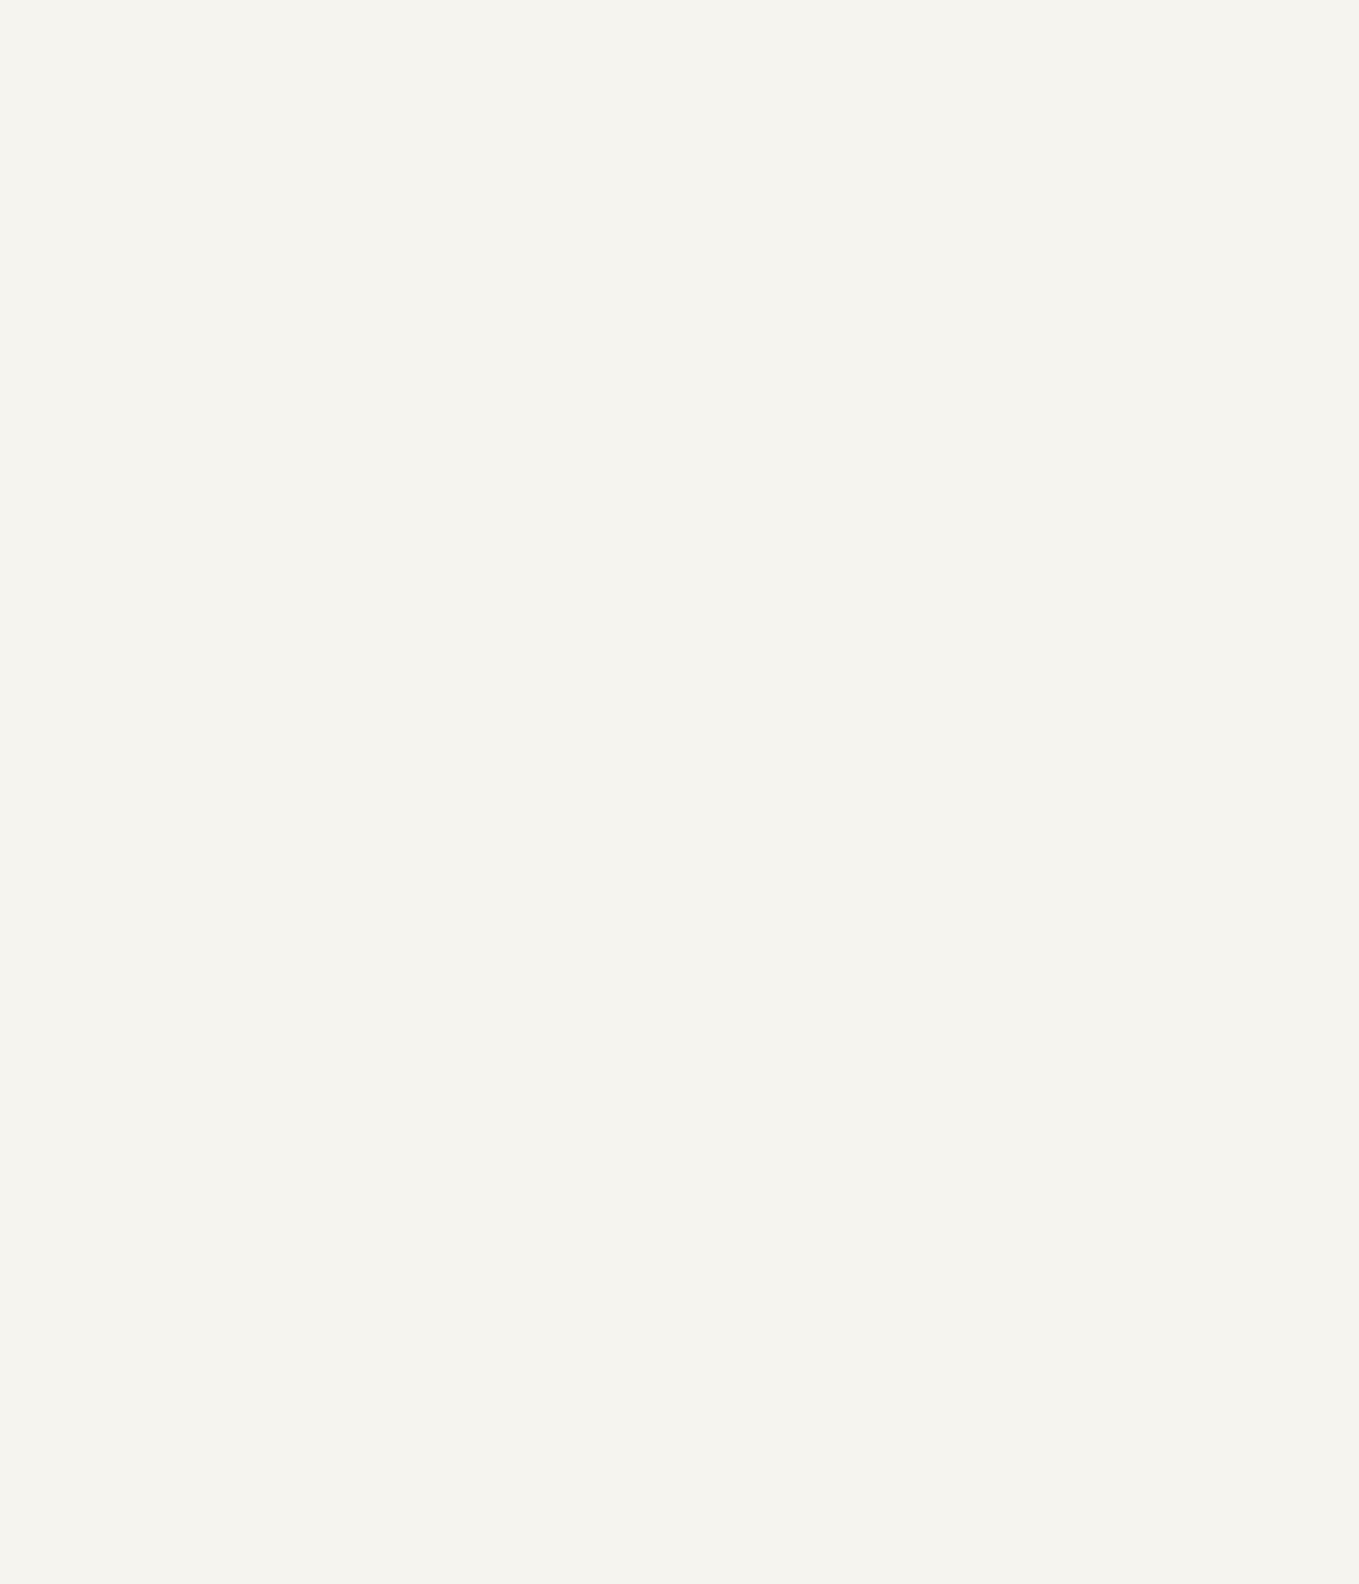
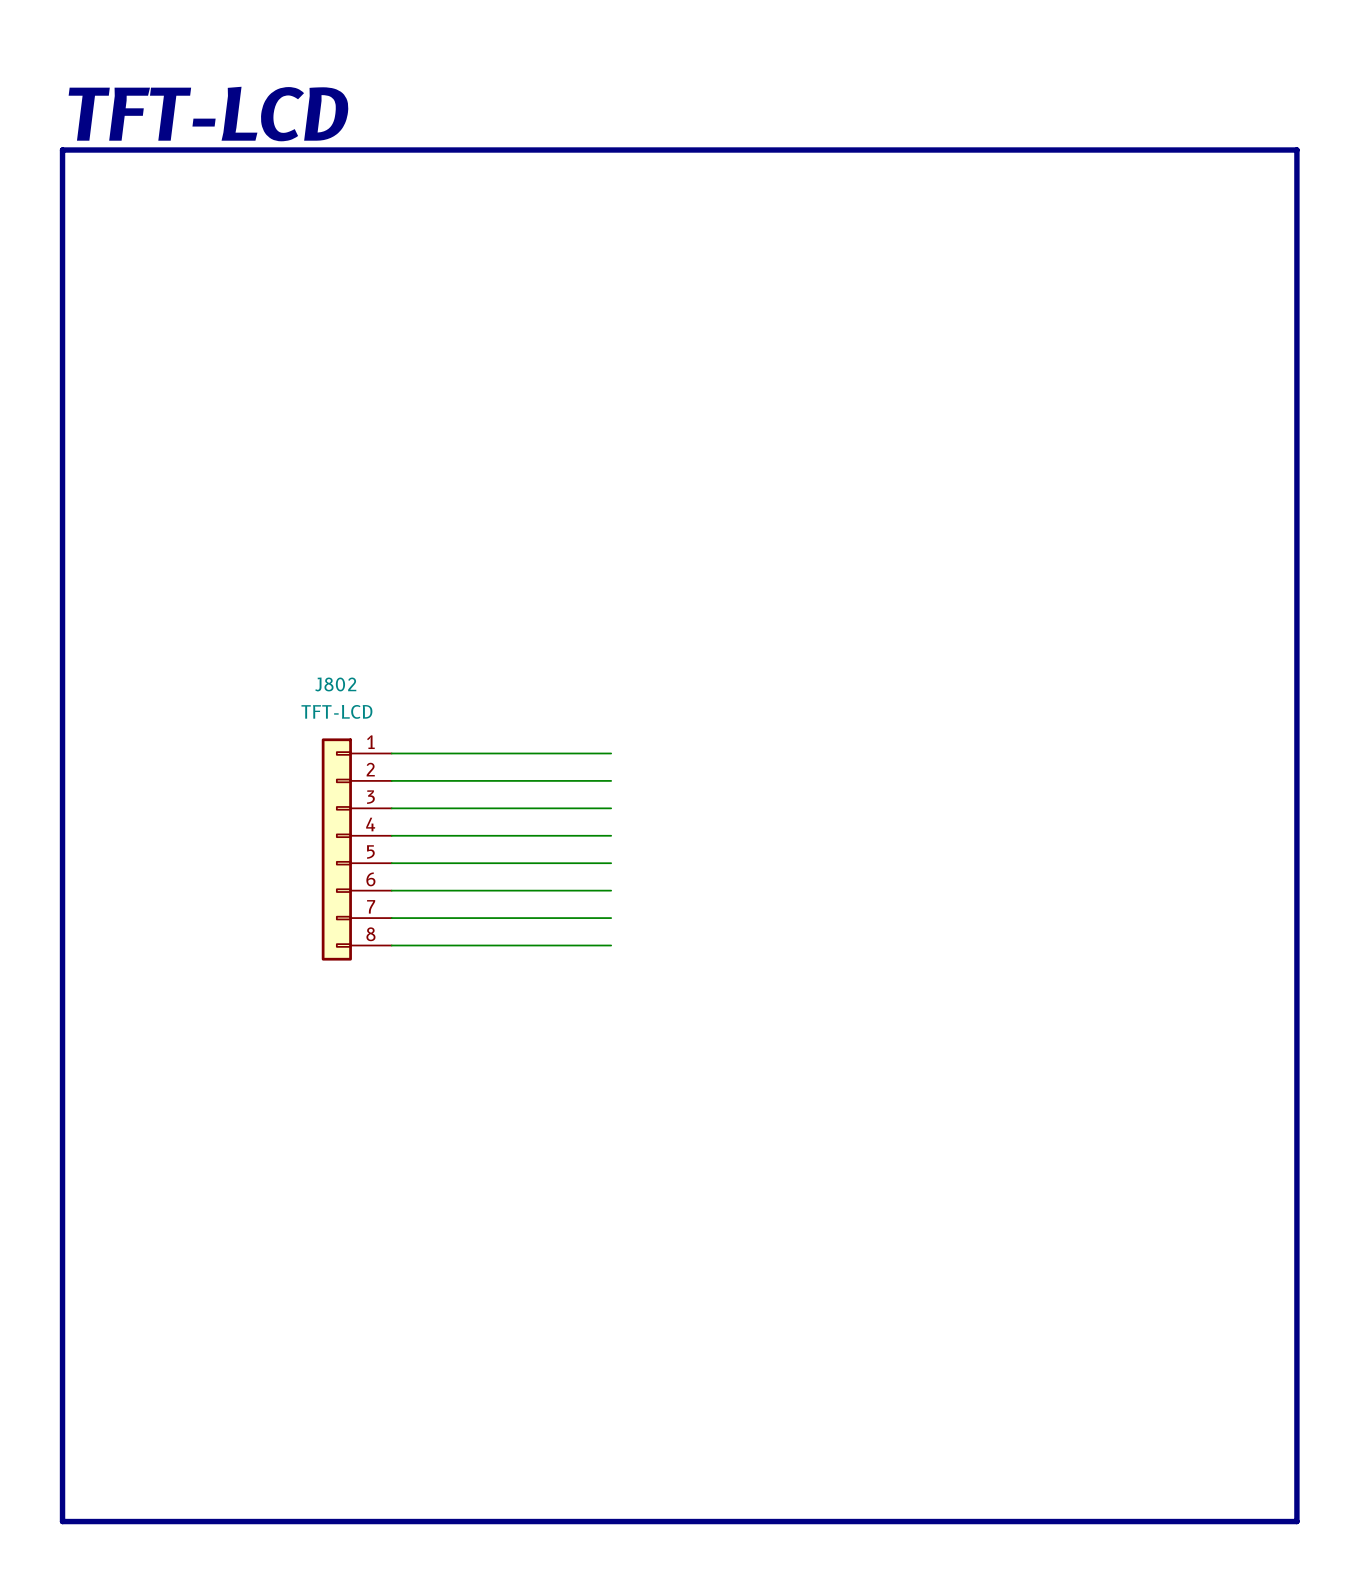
text: none -> TFT-LCD (208, 114)
line: none -> (62, 150) (1296, 150) (1296, 1521) (62, 1521) (62, 150)
wire: none -> (391, 753) (611, 753)
wire: none -> (391, 780) (611, 780)
wire: none -> (391, 808) (611, 808)
wire: none -> (391, 835) (611, 835)
J802: none -> TFT-LCD (356, 849)
wire: none -> (391, 863) (611, 863)
wire: none -> (391, 890) (611, 890)
wire: none -> (391, 918) (611, 918)
wire: none -> (391, 945) (611, 945)

